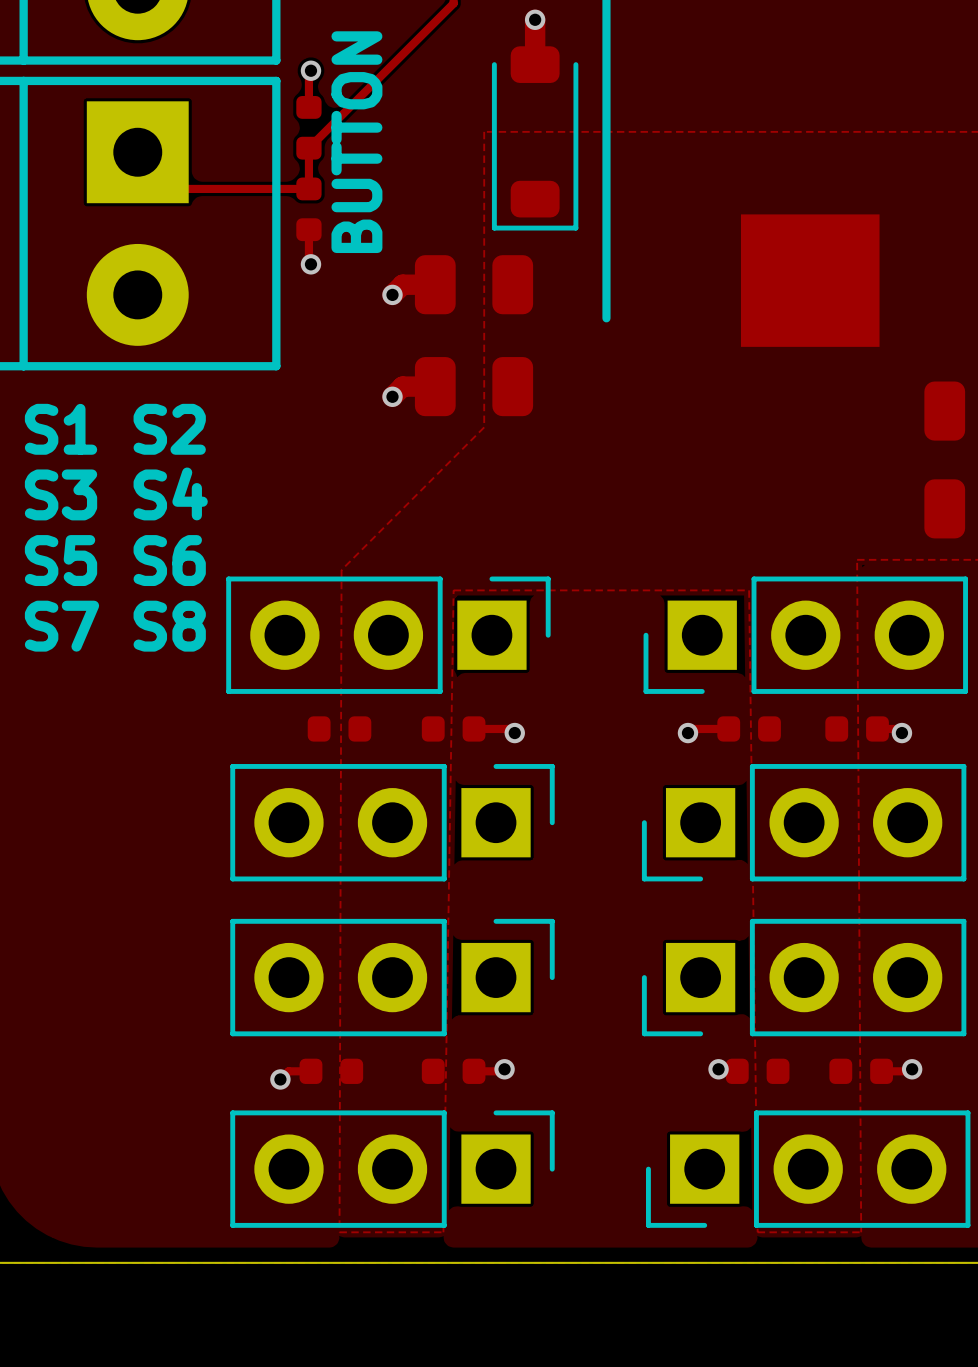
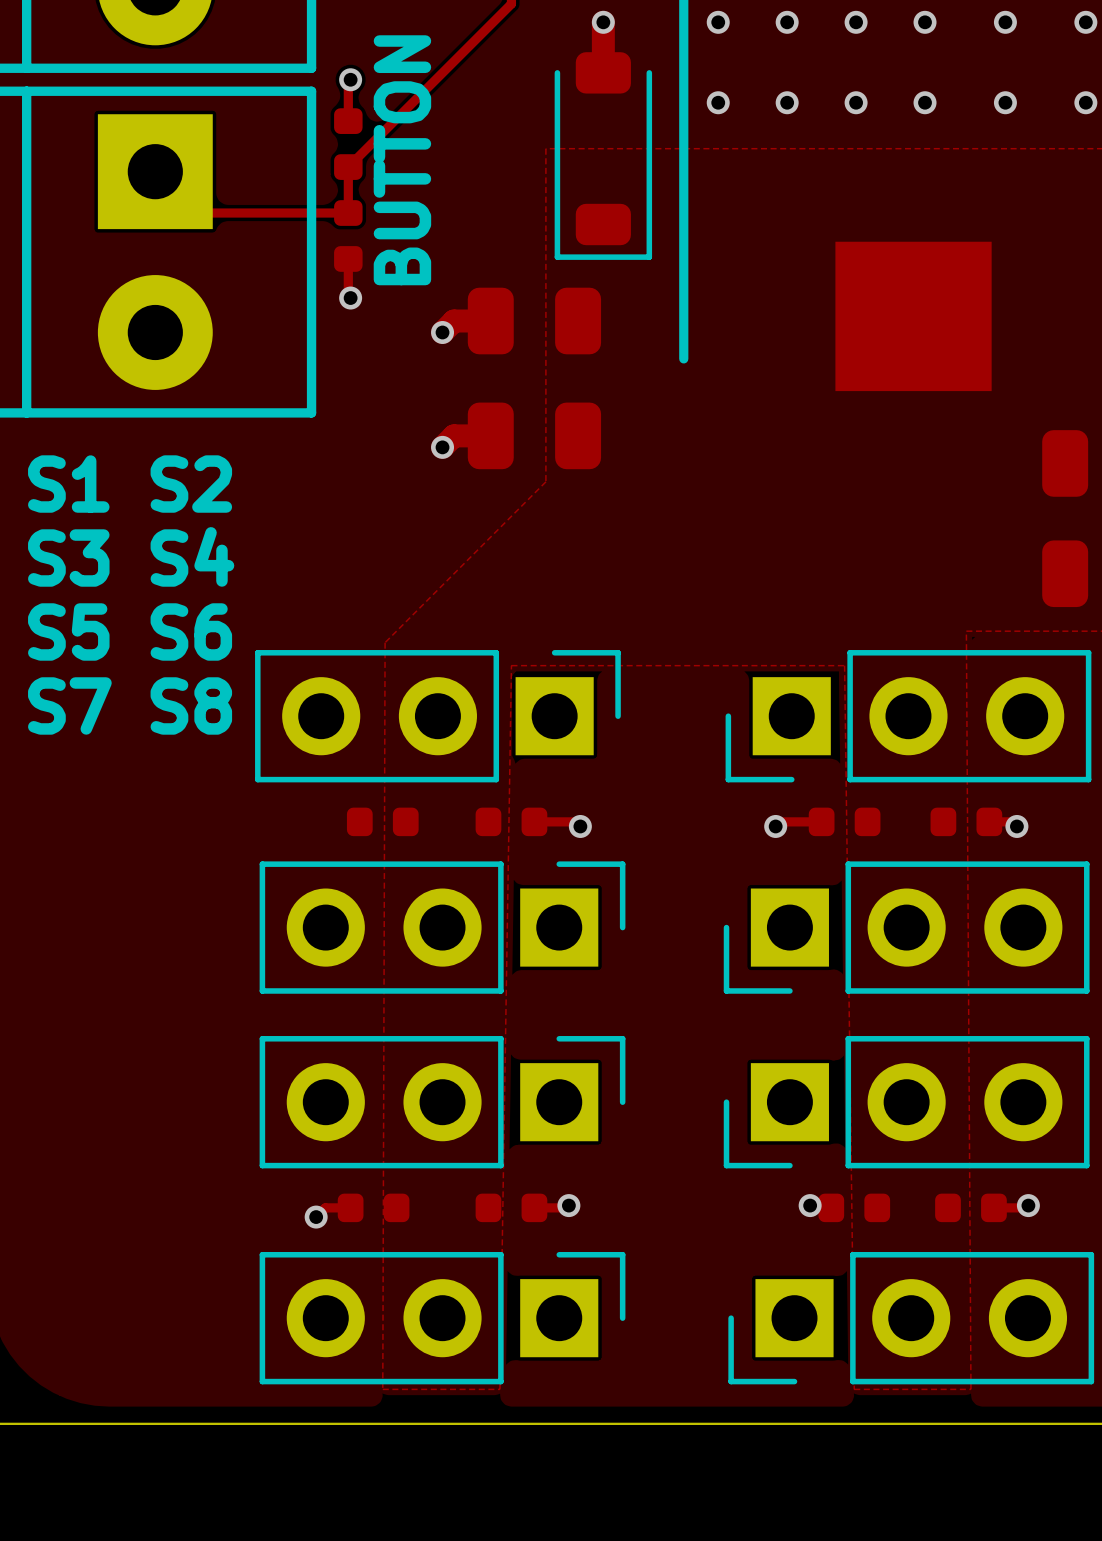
via: none -> (718, 22)
via: none -> (787, 22)
via: none -> (856, 22)
via: none -> (925, 22)
via: none -> (1005, 22)
via: none -> (1085, 22)
via: none -> (718, 102)
via: none -> (787, 102)
via: none -> (856, 102)
via: none -> (925, 102)
via: none -> (1005, 102)
via: none -> (1085, 102)

